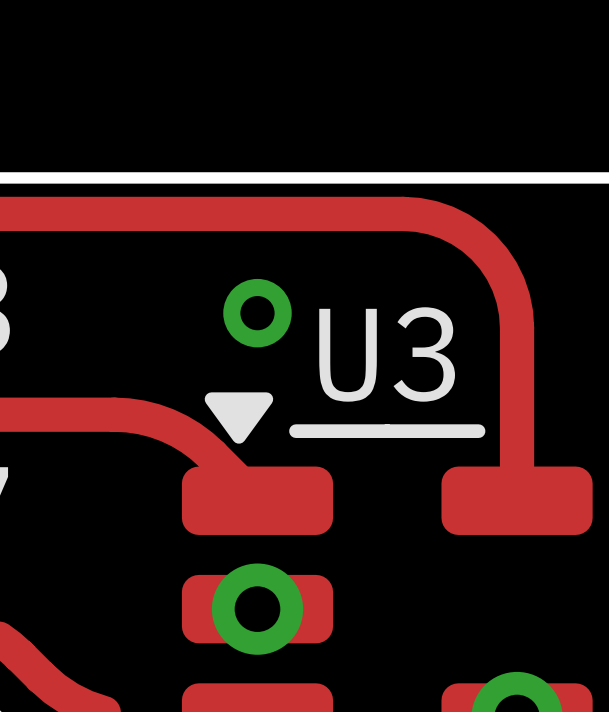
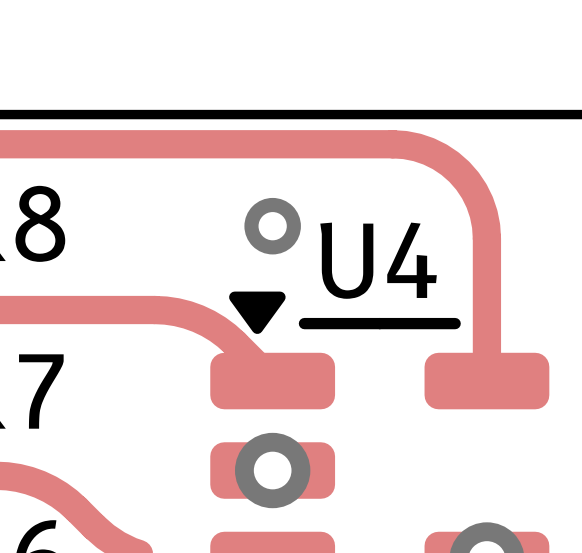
U3 name: U3 (387, 354) -> U4 (378, 260)

